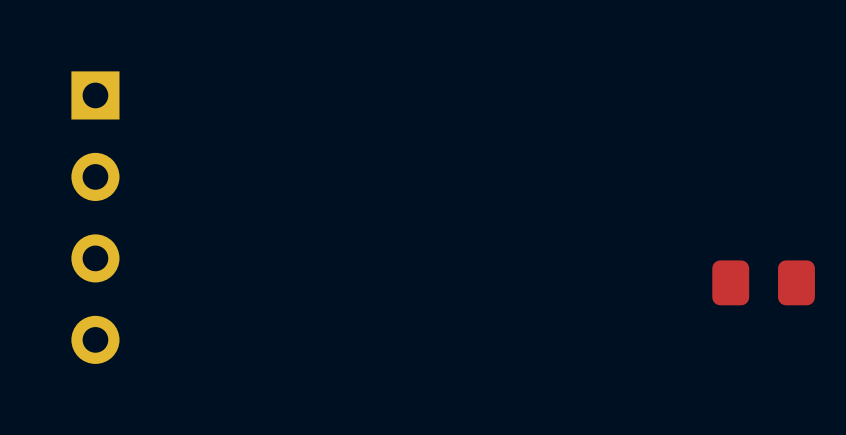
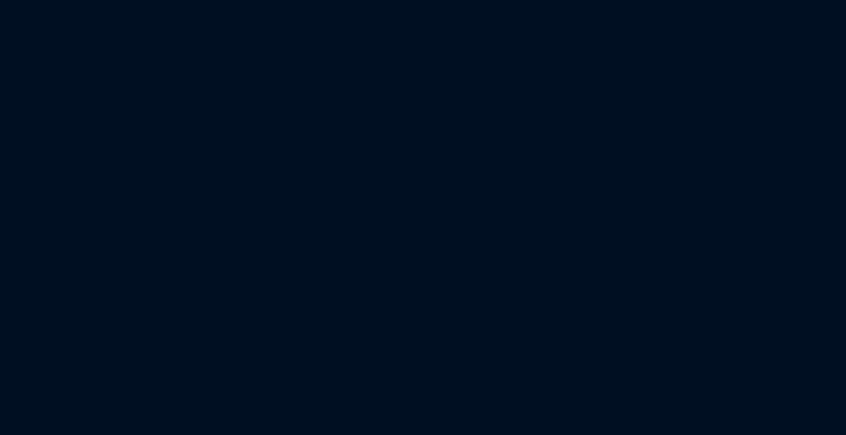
part: (95, 217) -> none
part: (763, 282) -> none

